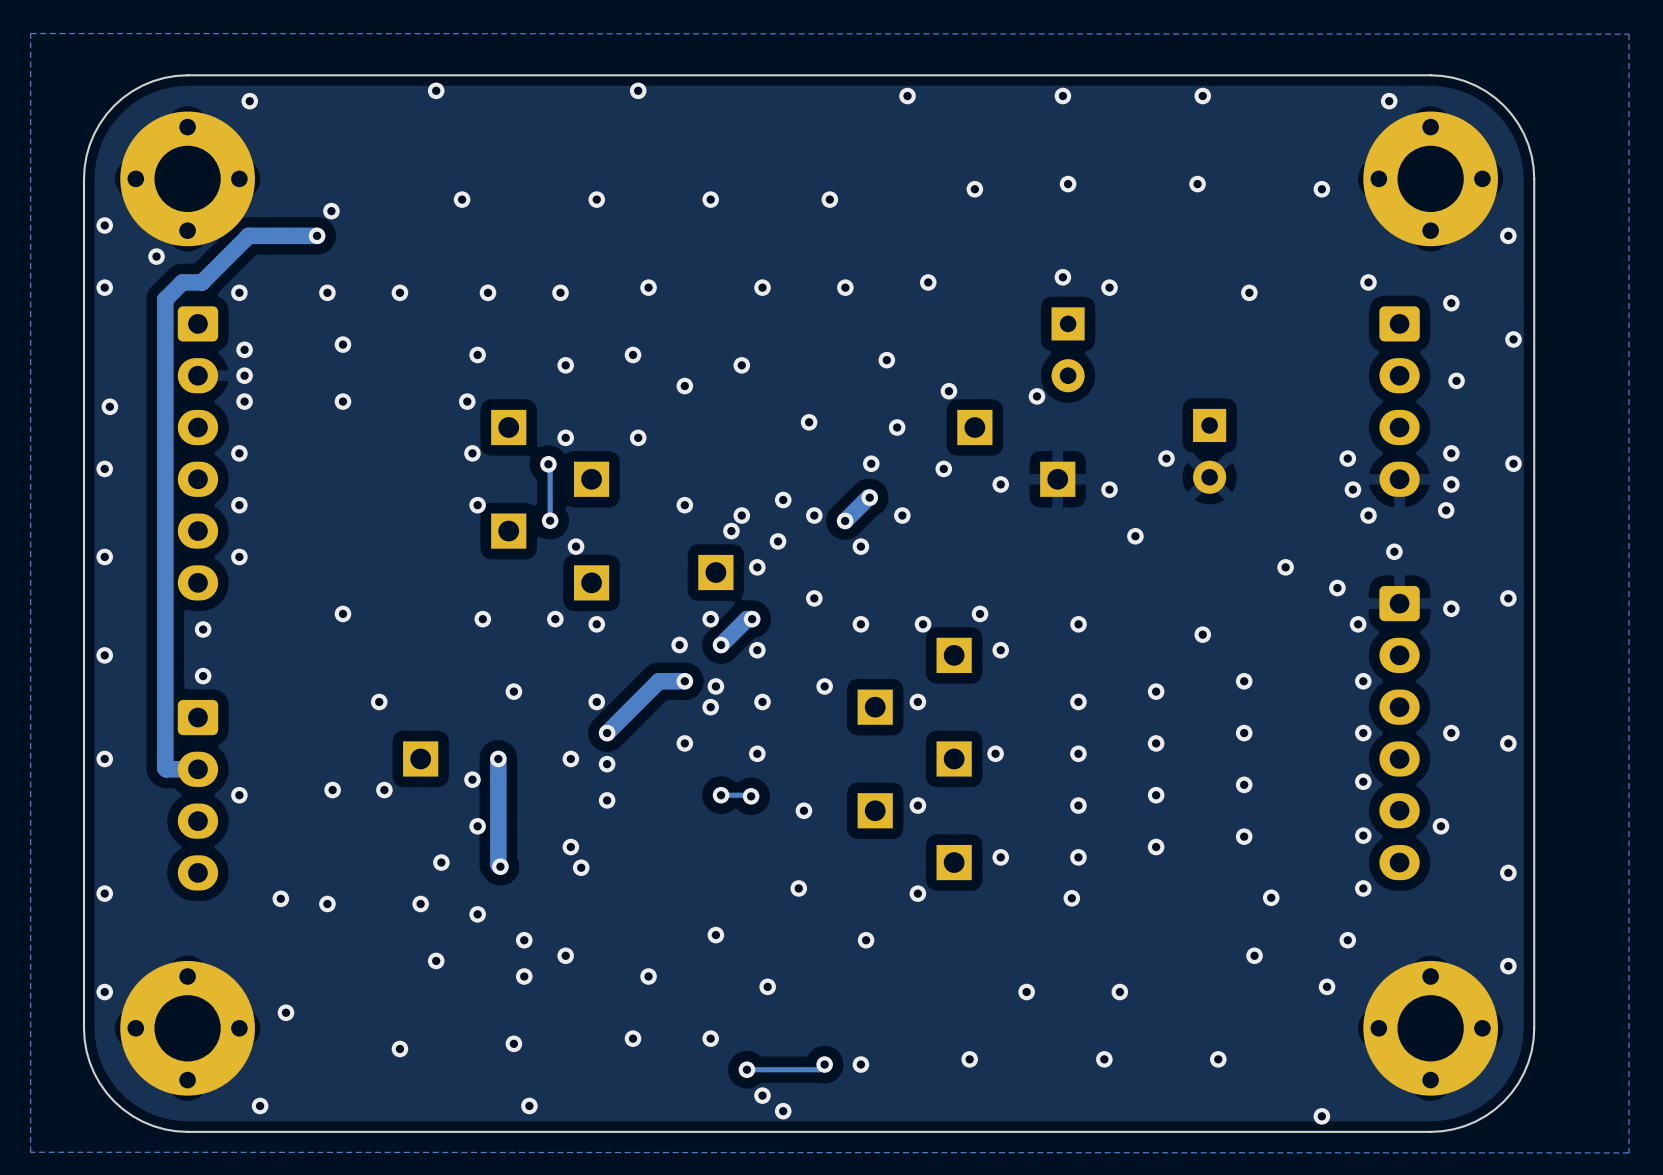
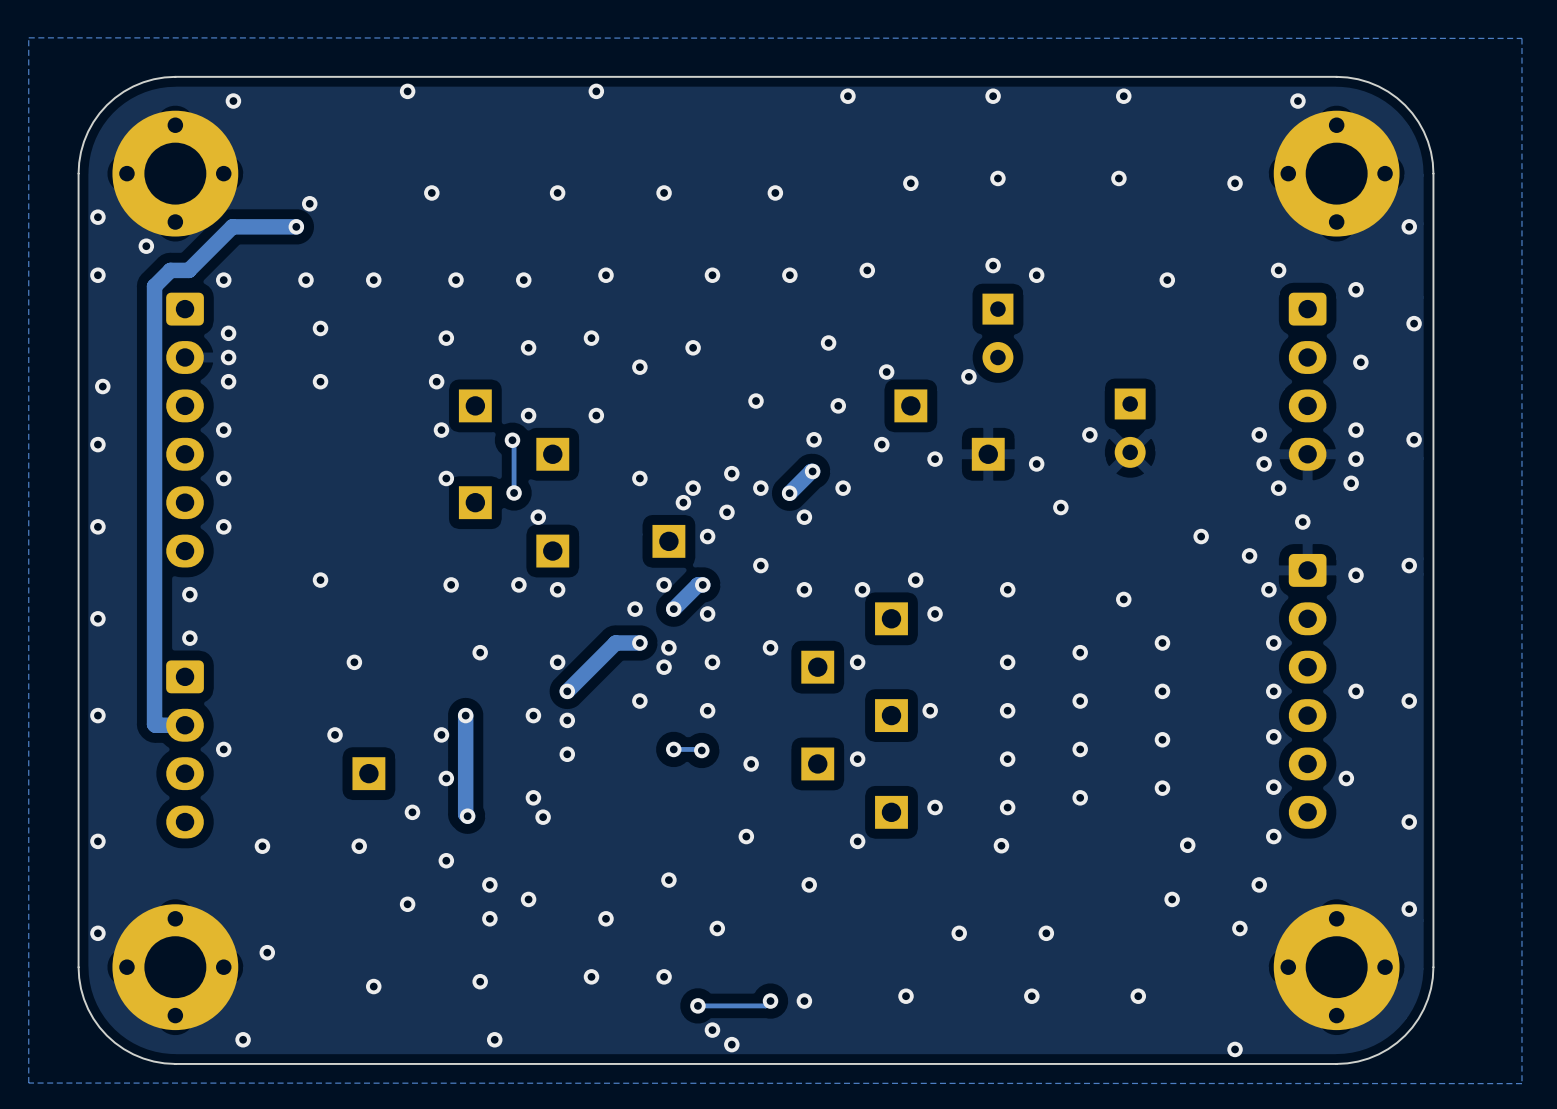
part position: (420, 758) -> (368, 773)
via: none -> (335, 734)
via: (332, 790) -> none
via: (384, 790) -> none
via: none -> (359, 846)
via: (327, 903) -> none
via: (420, 903) -> none

